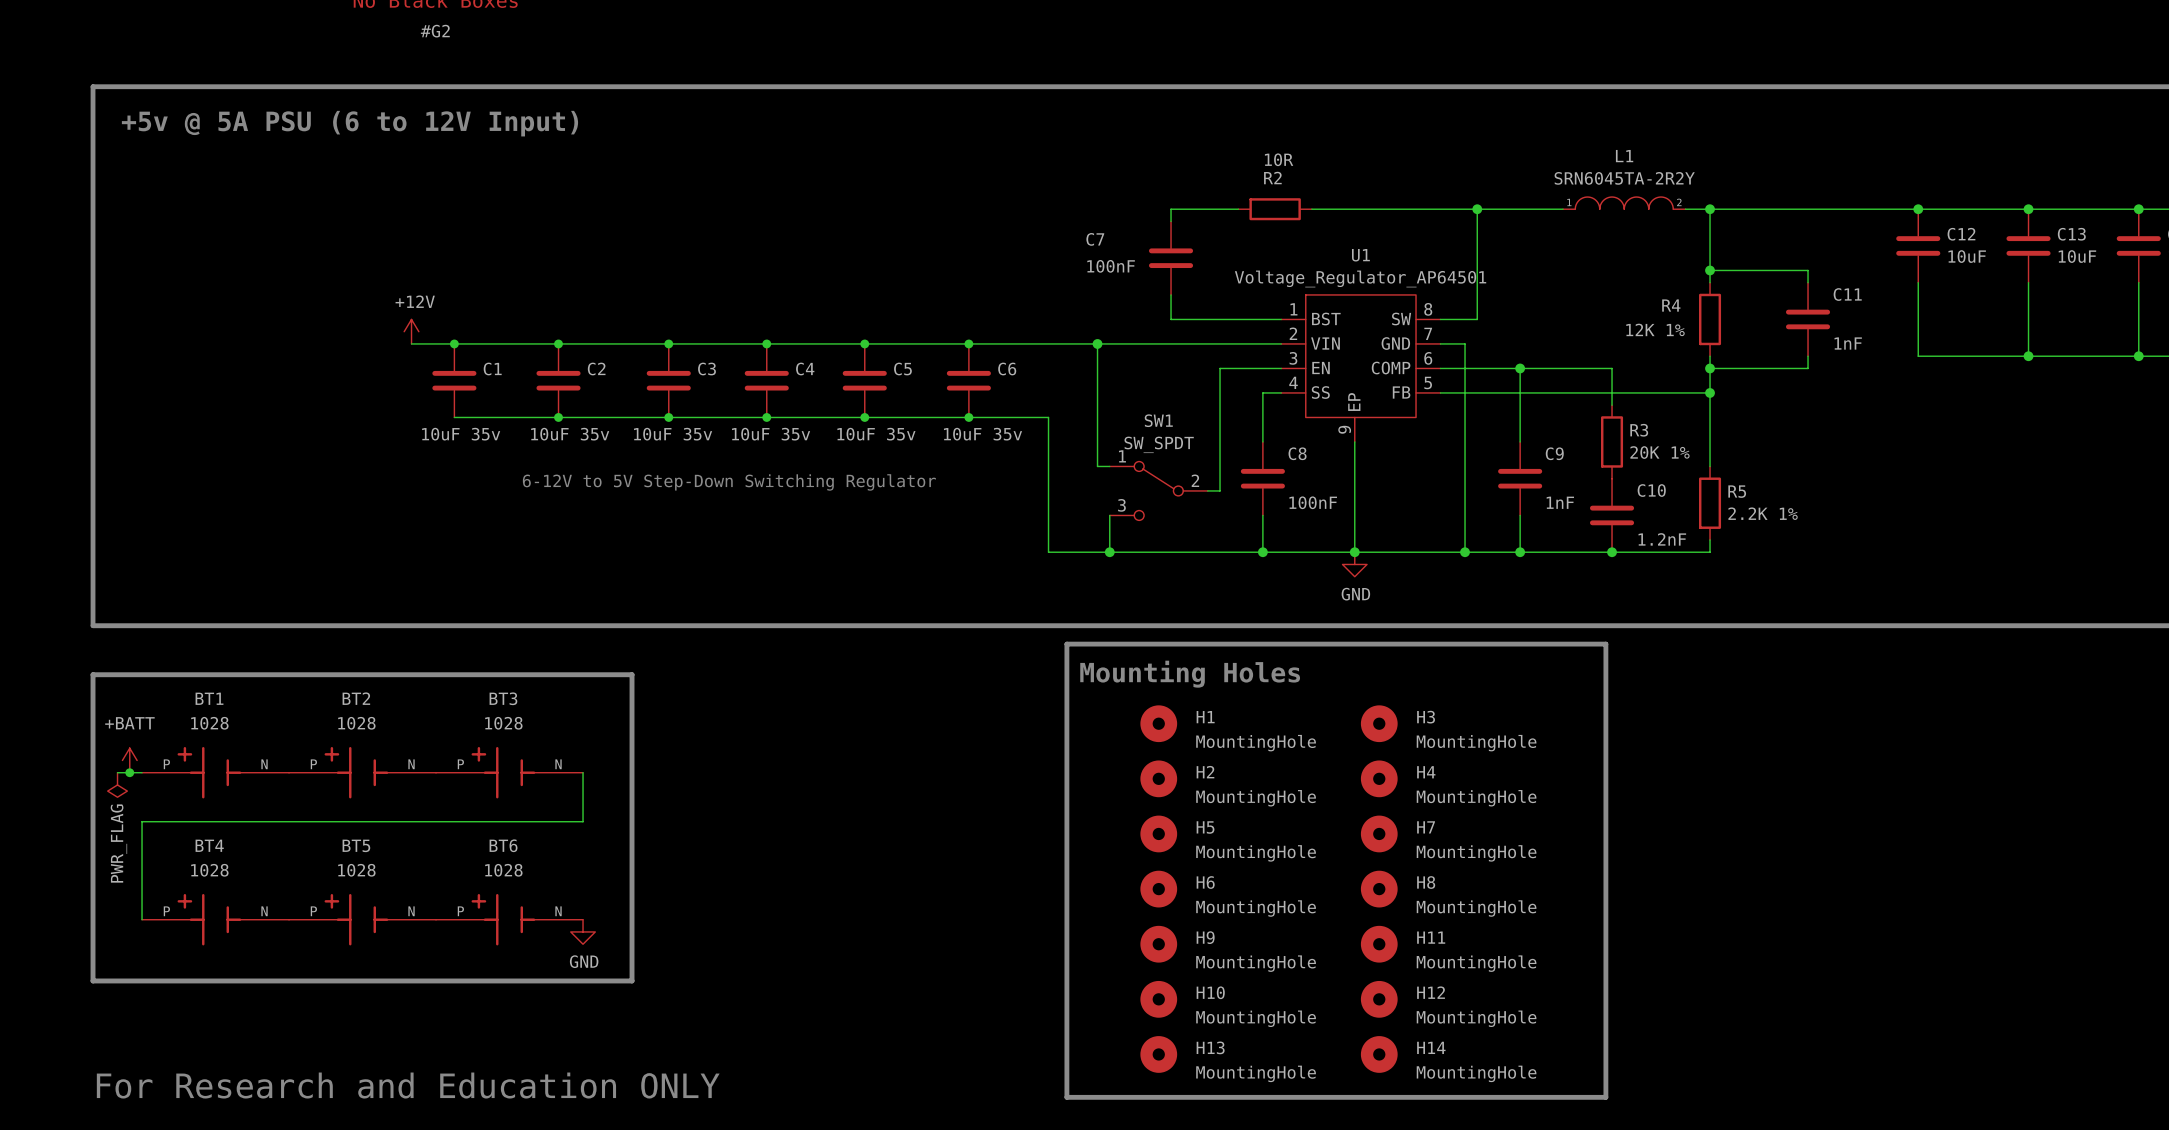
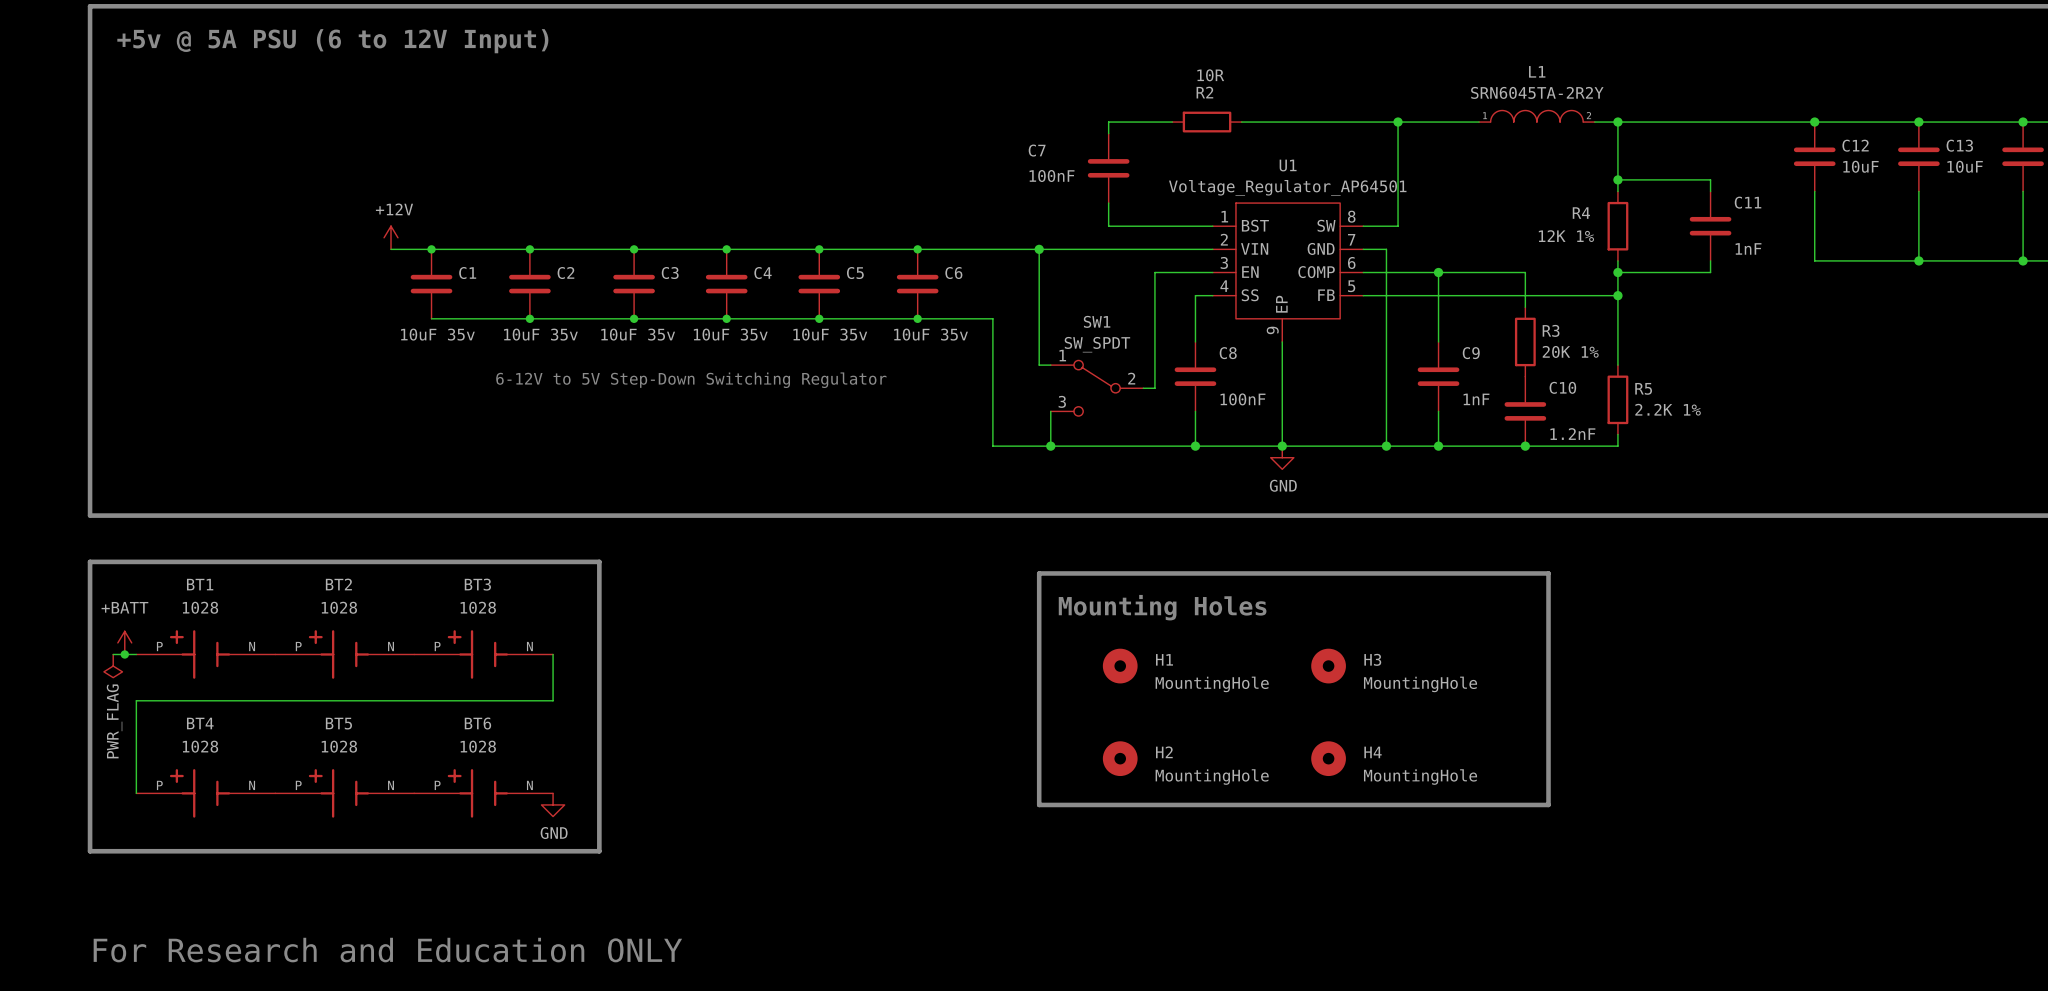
line: (1066, 644) (1066, 1097) (1605, 1097) (1605, 644) (1066, 644) -> none
text position: Mounting Holes (1190, 674) -> Mounting Holes (1162, 607)
line: none -> (1039, 573) (1039, 804) (1548, 804) (1548, 573) (1039, 573)
H1 position: (1158, 723) -> (1120, 666)
H3 position: (1379, 723) -> (1328, 666)
H2 position: (1158, 778) -> (1120, 758)
H4 position: (1379, 778) -> (1328, 758)
H5: MountingHole (1158, 833) -> none
H7: MountingHole (1379, 833) -> none
H6: MountingHole (1158, 889) -> none
H8: MountingHole (1379, 889) -> none
H9: MountingHole (1158, 944) -> none
H11: MountingHole (1379, 944) -> none
H10: MountingHole (1158, 999) -> none
H12: MountingHole (1379, 999) -> none
H13: MountingHole (1158, 1054) -> none
H14: MountingHole (1379, 1054) -> none

